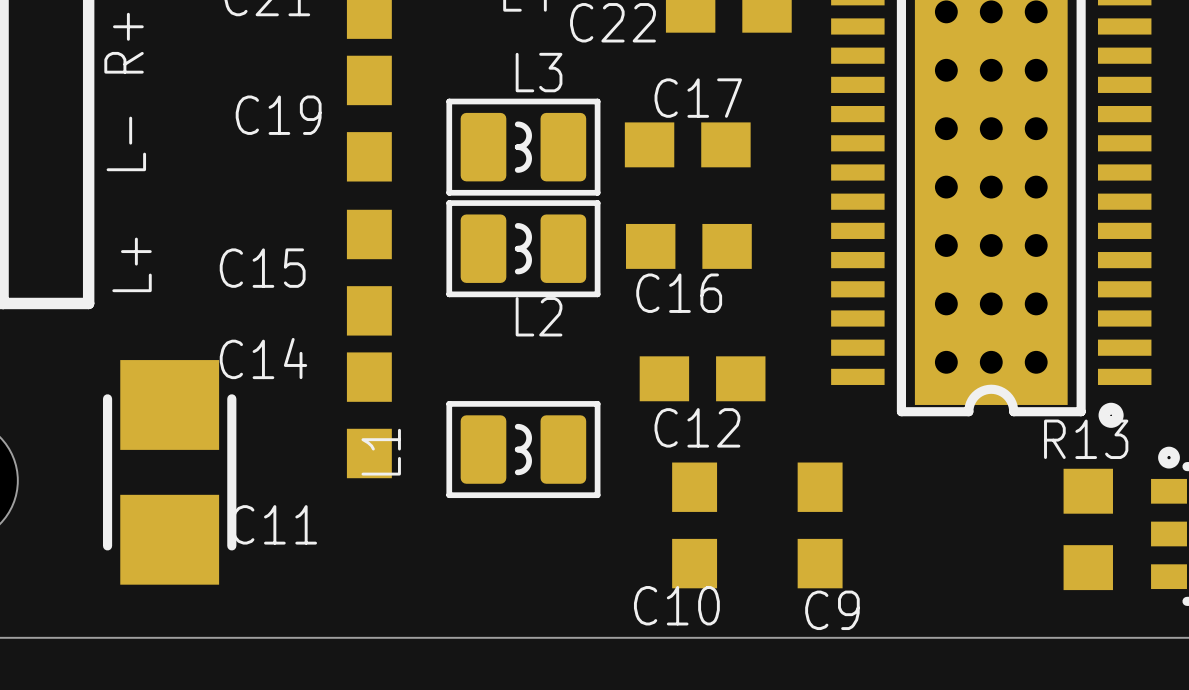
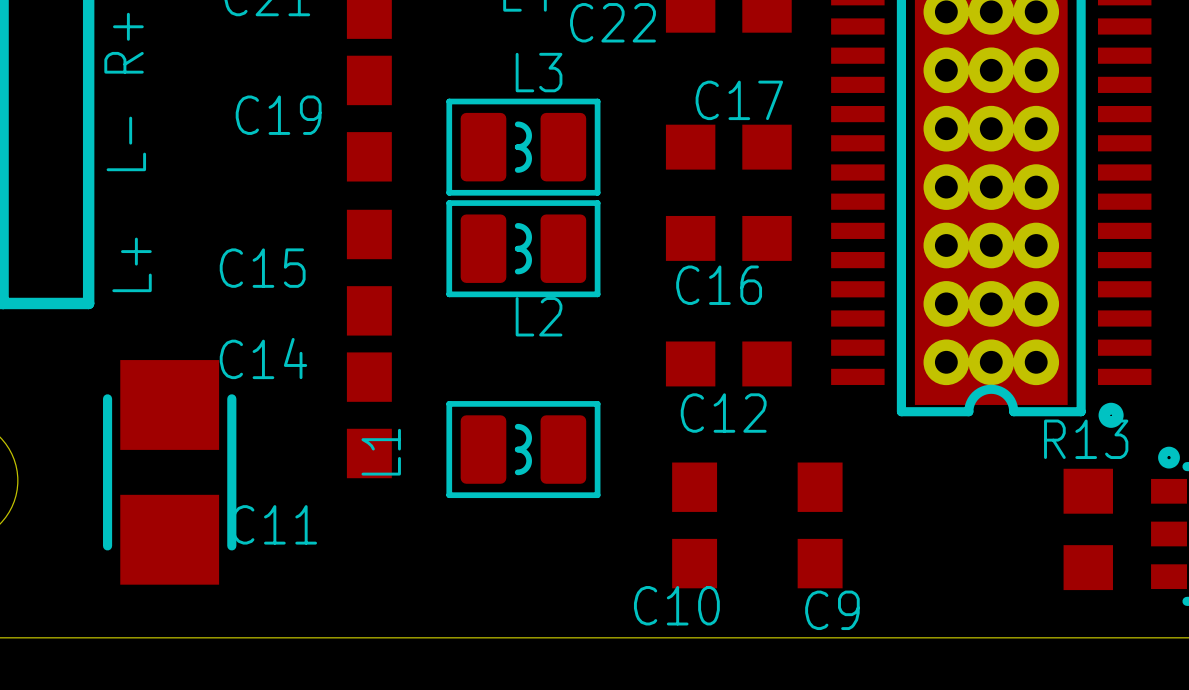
C17 position: (687, 144) -> (728, 147)
C16 position: (688, 246) -> (728, 238)
C12 position: (702, 378) -> (728, 363)

